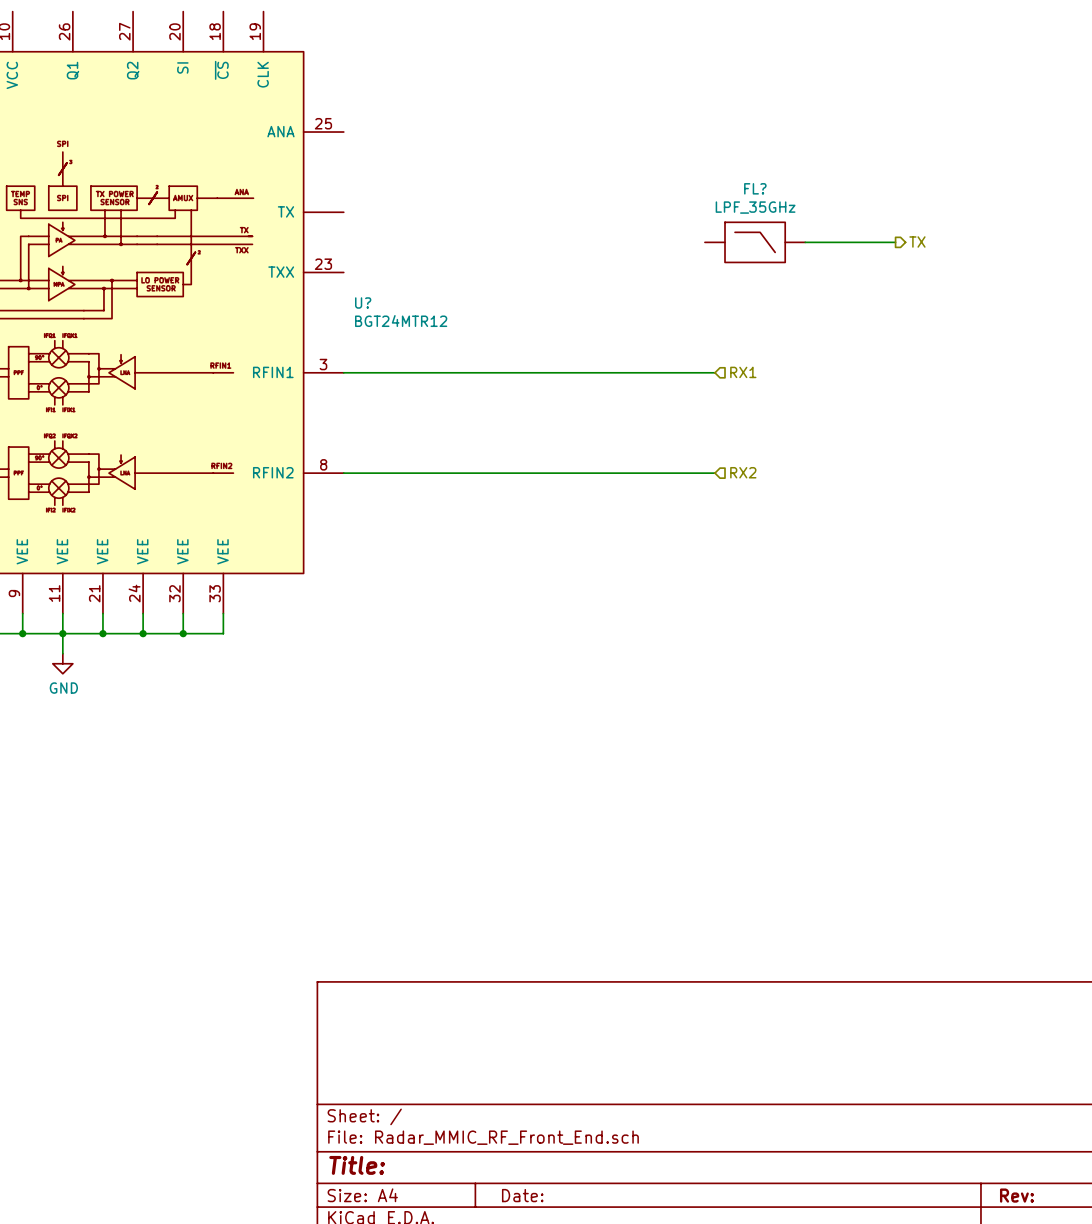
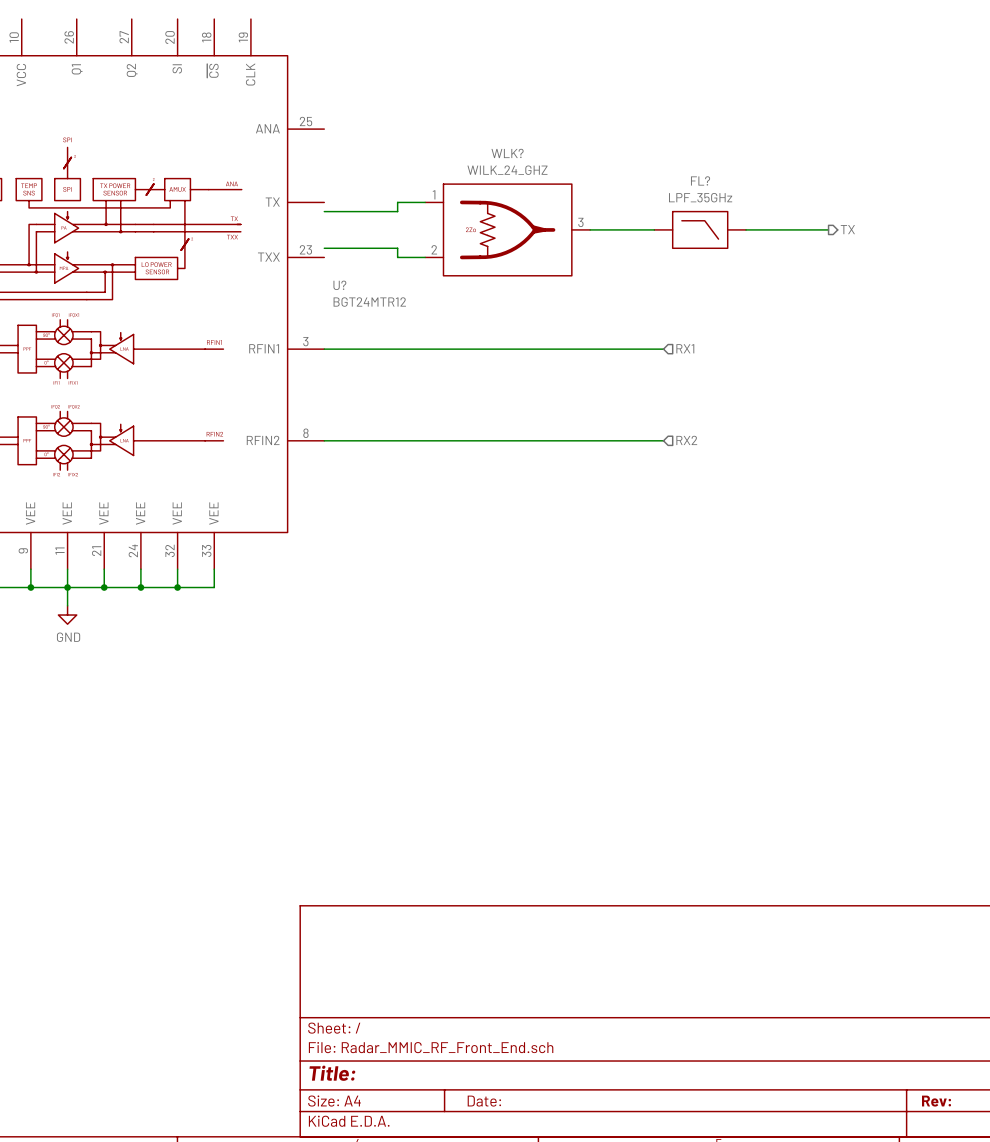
wire: none -> (425, 202) (397, 202) (397, 211) (324, 211)
WLK?: none -> WILK_24_GHZ (507, 229)
wire: none -> (590, 229) (654, 229)
wire: none -> (324, 248) (397, 248) (397, 257) (425, 257)

